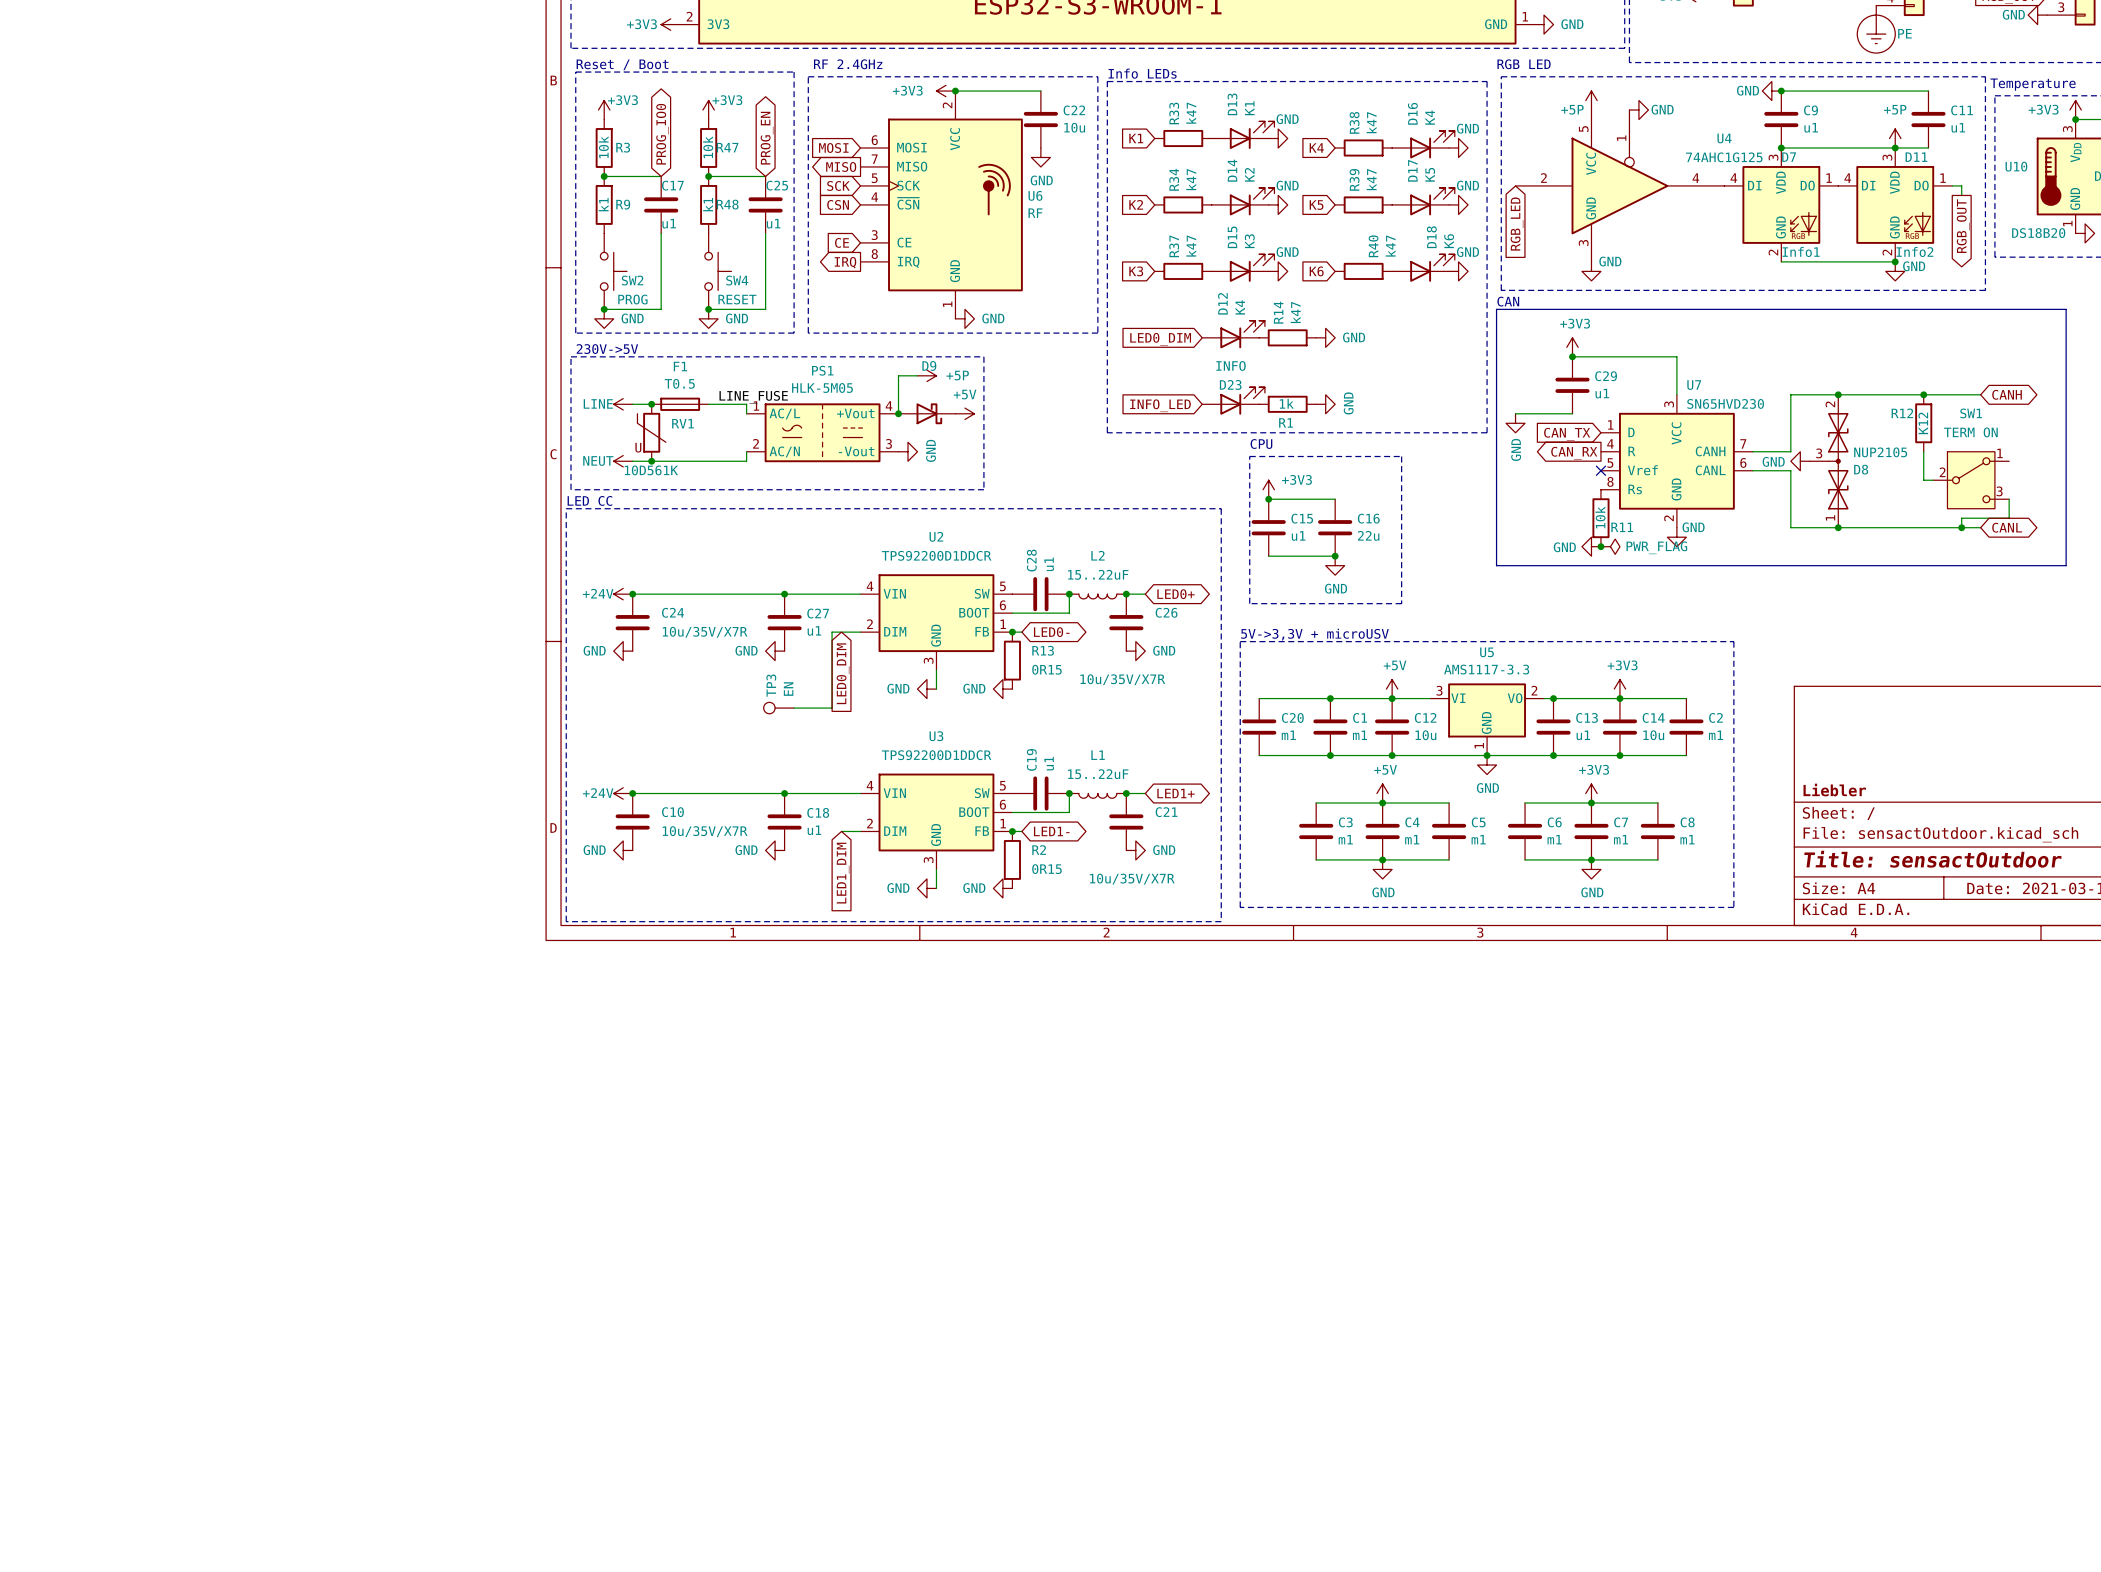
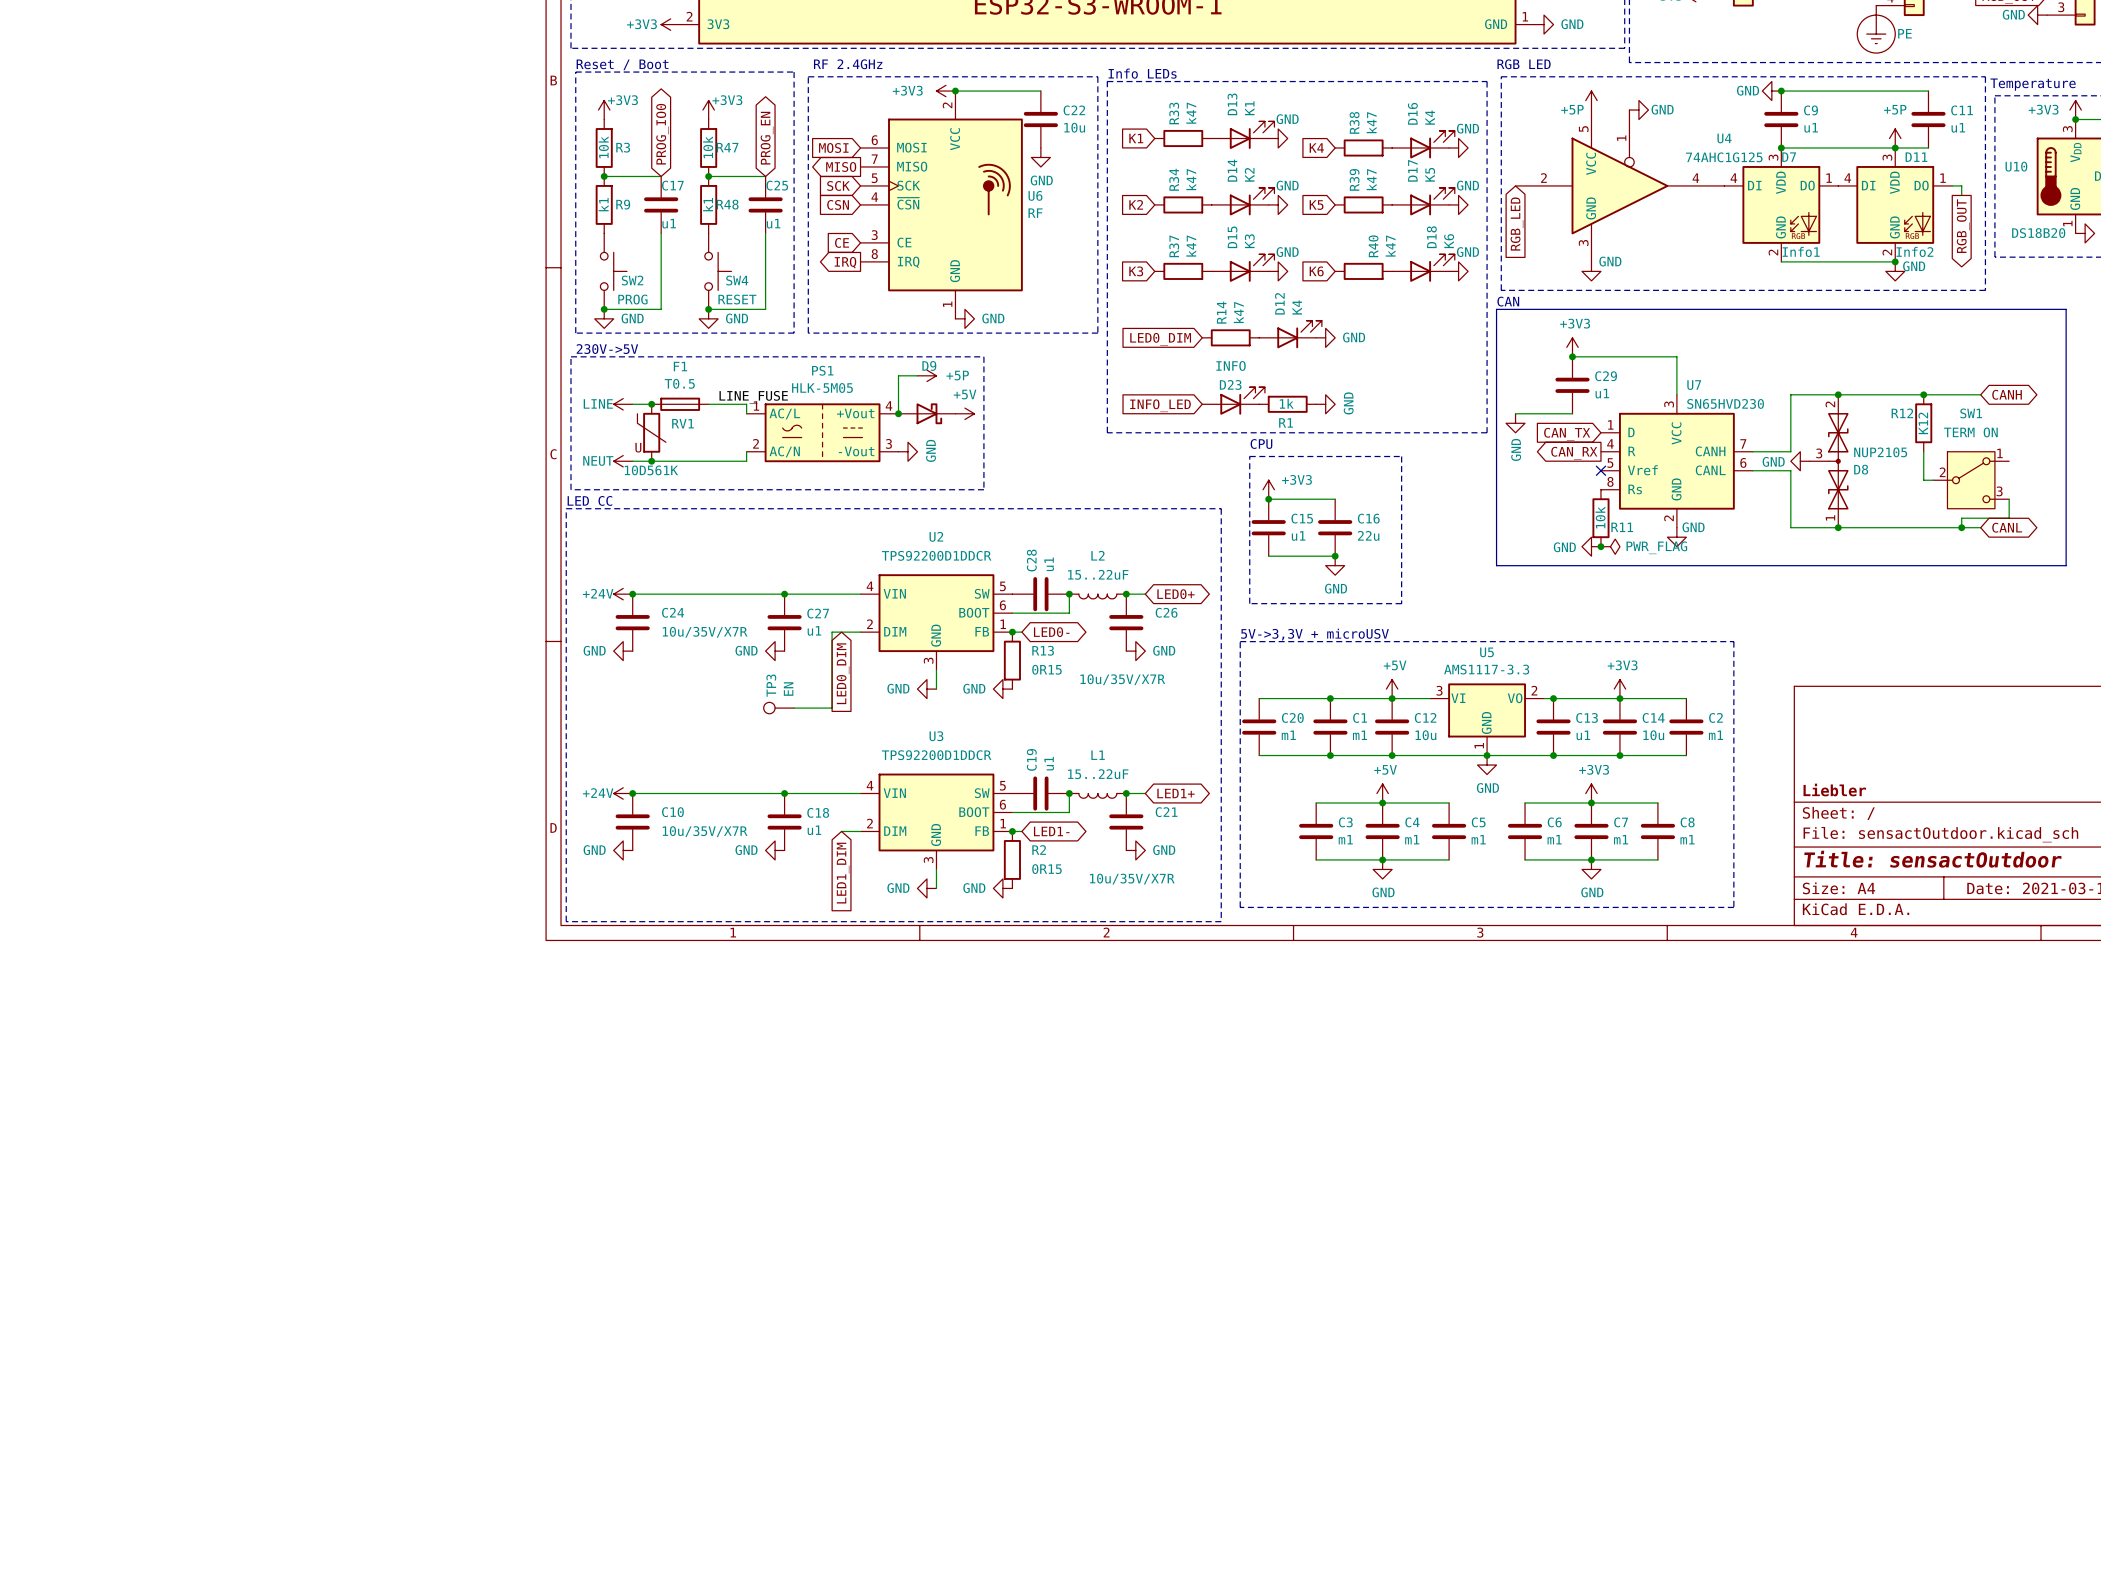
D12 position: (1233, 334) -> (1290, 334)
R14 position: (1287, 337) -> (1230, 337)

